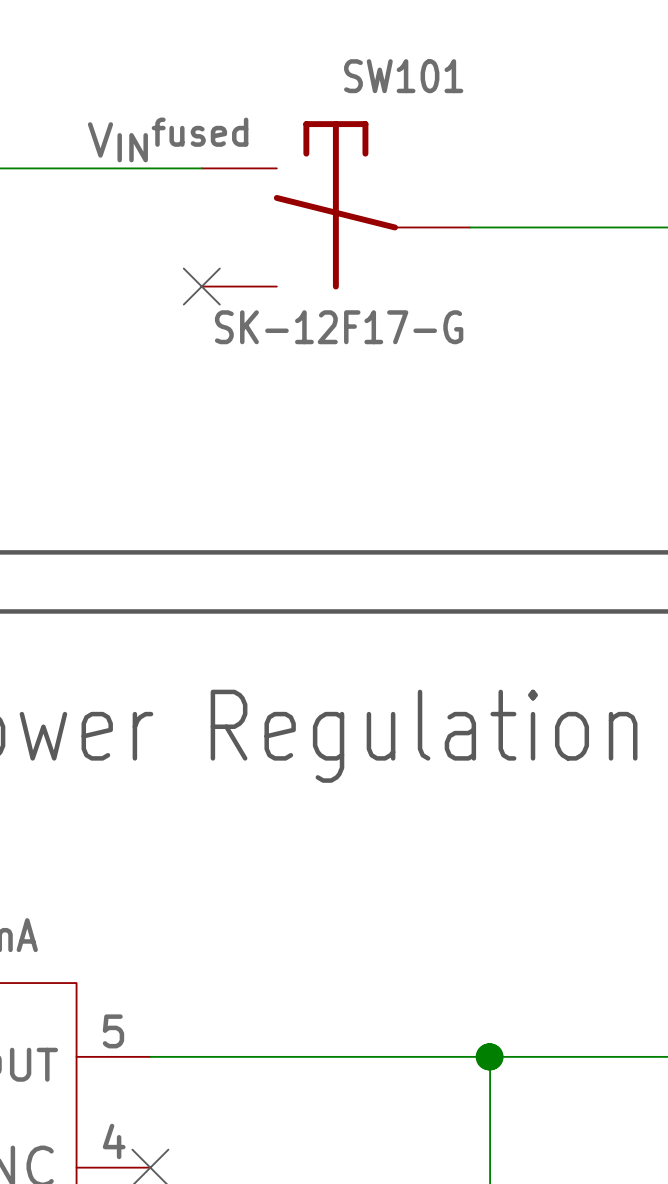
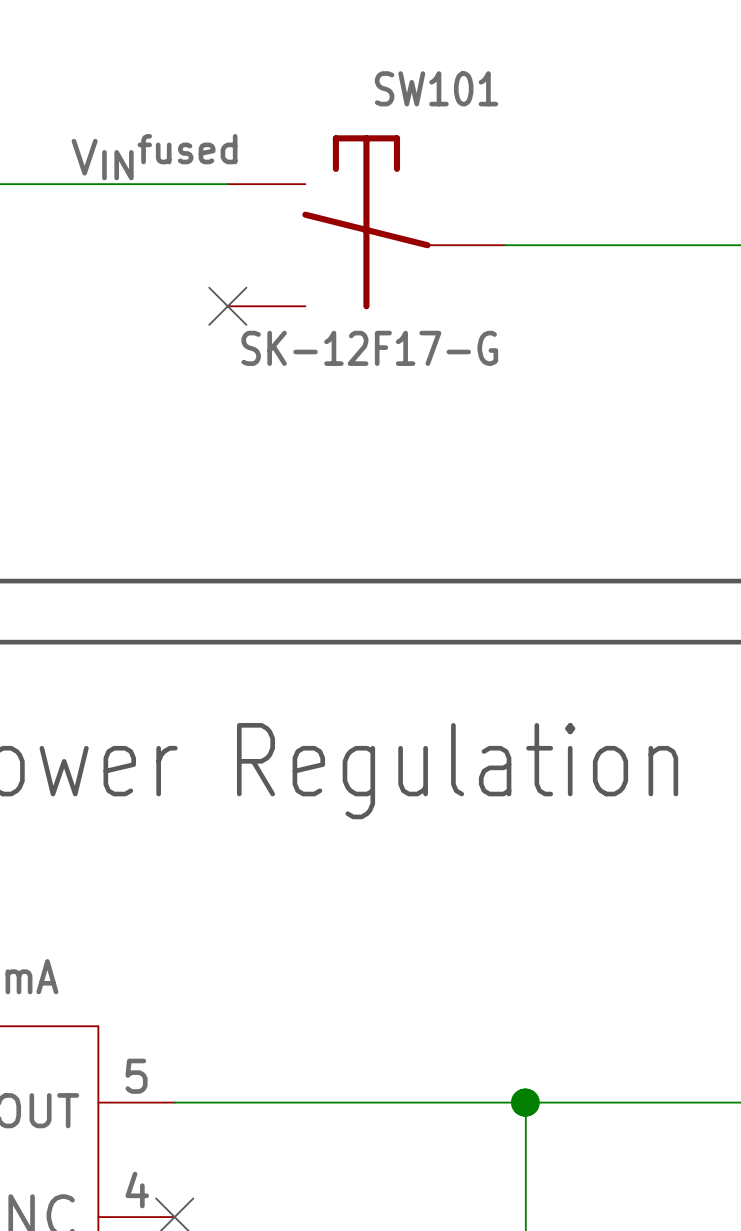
label position: VINfused (168, 139) -> VINfused (154, 157)

